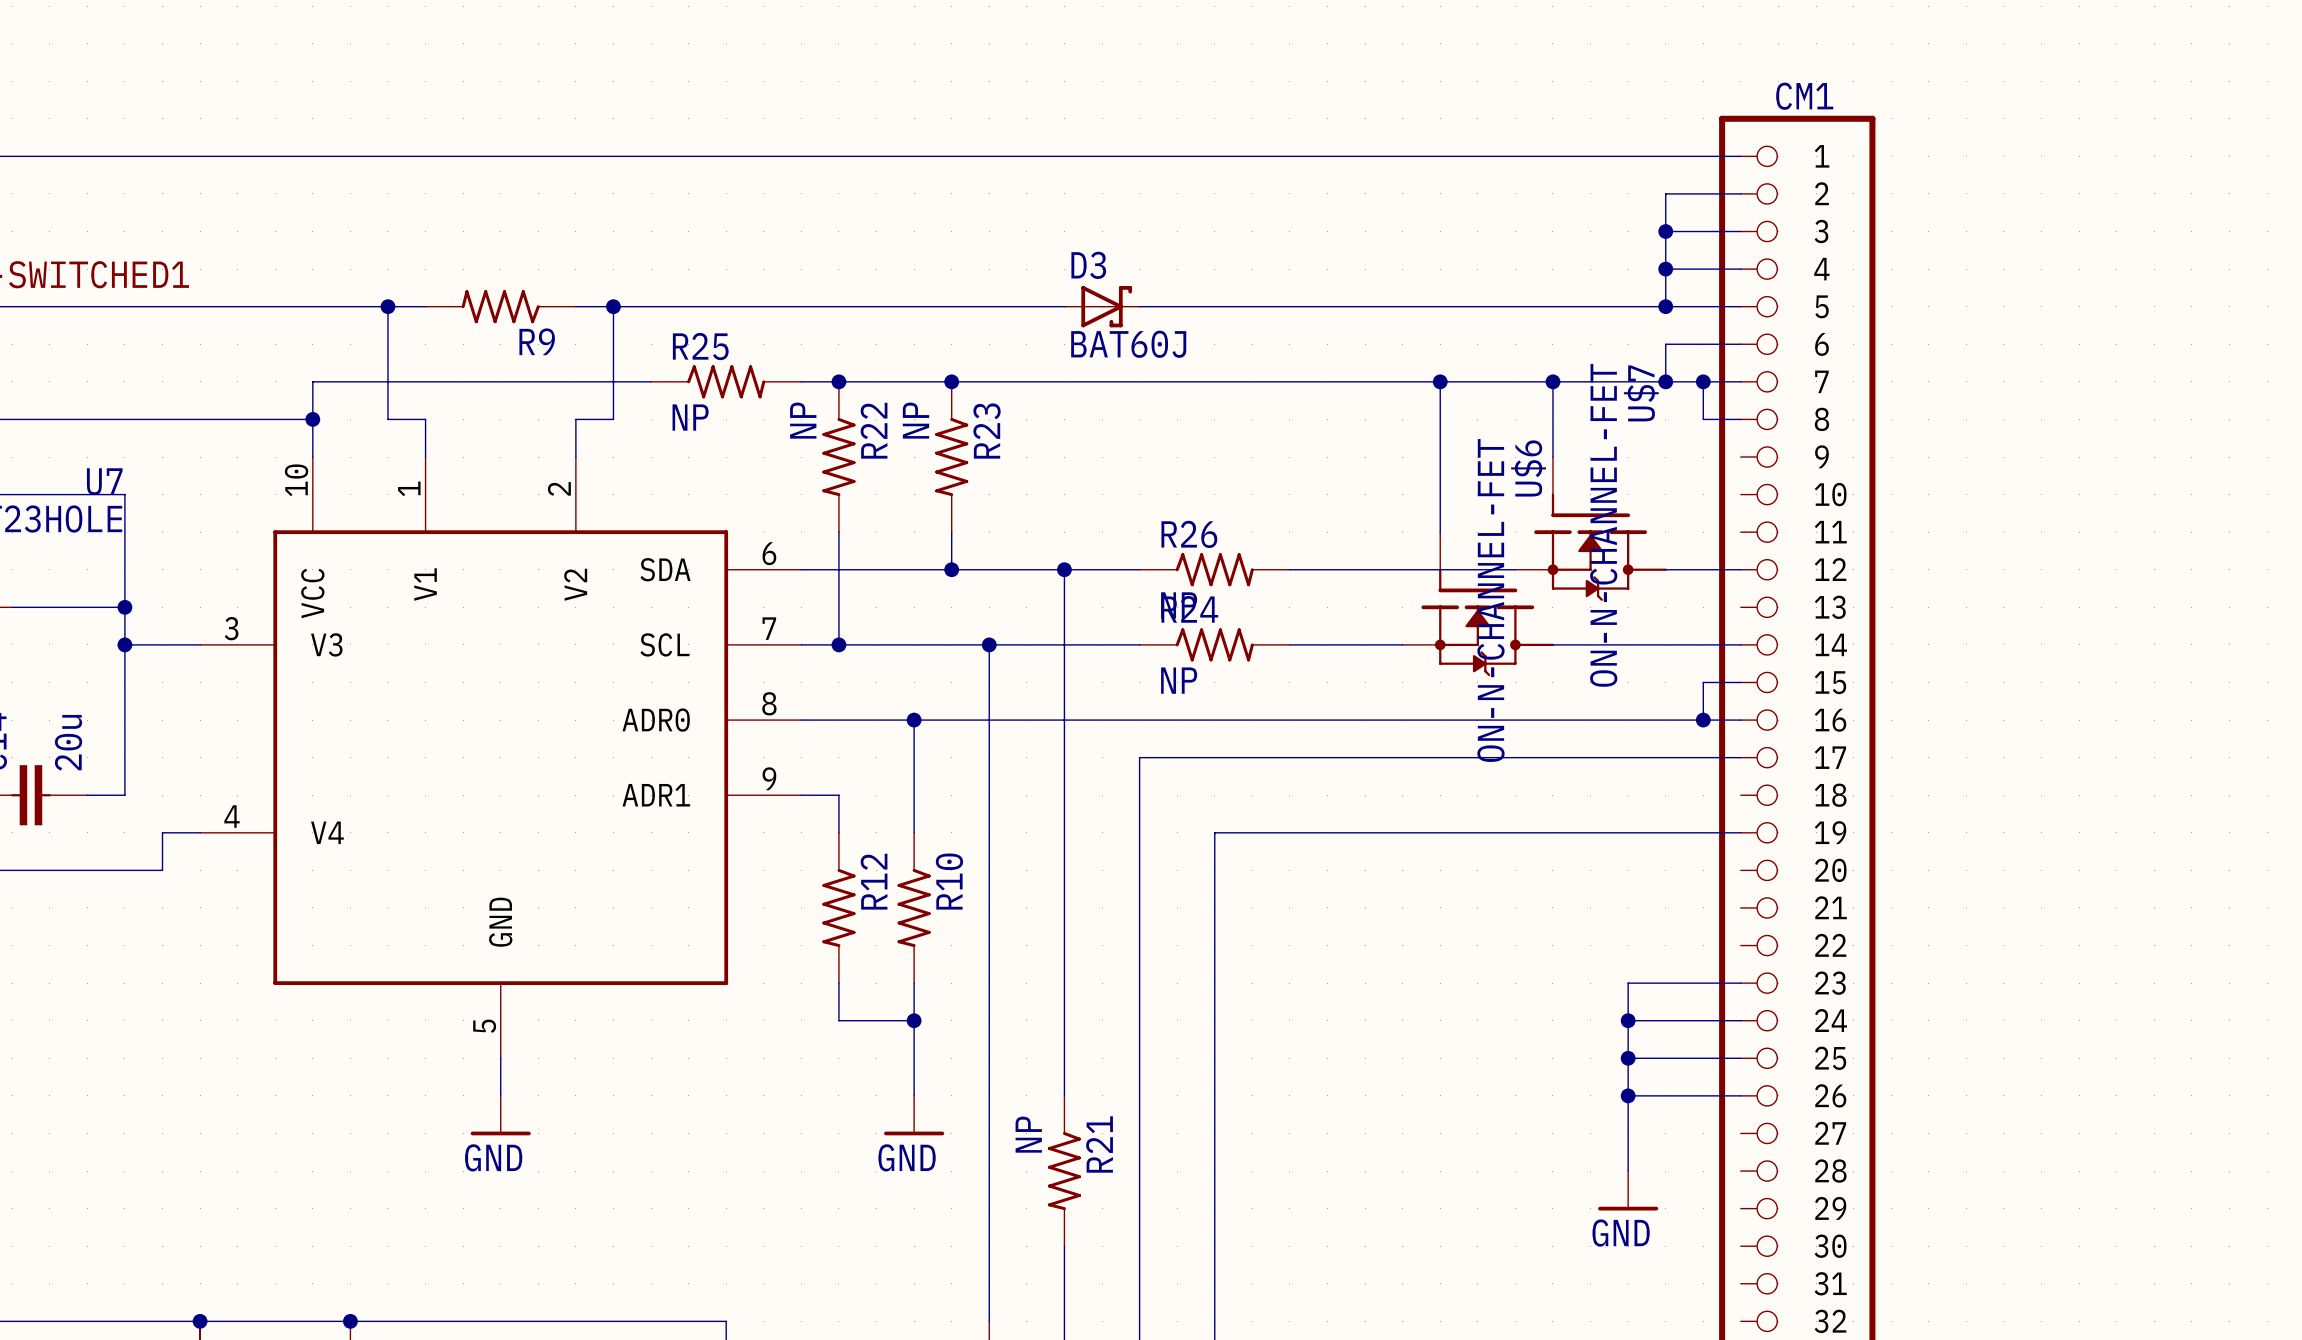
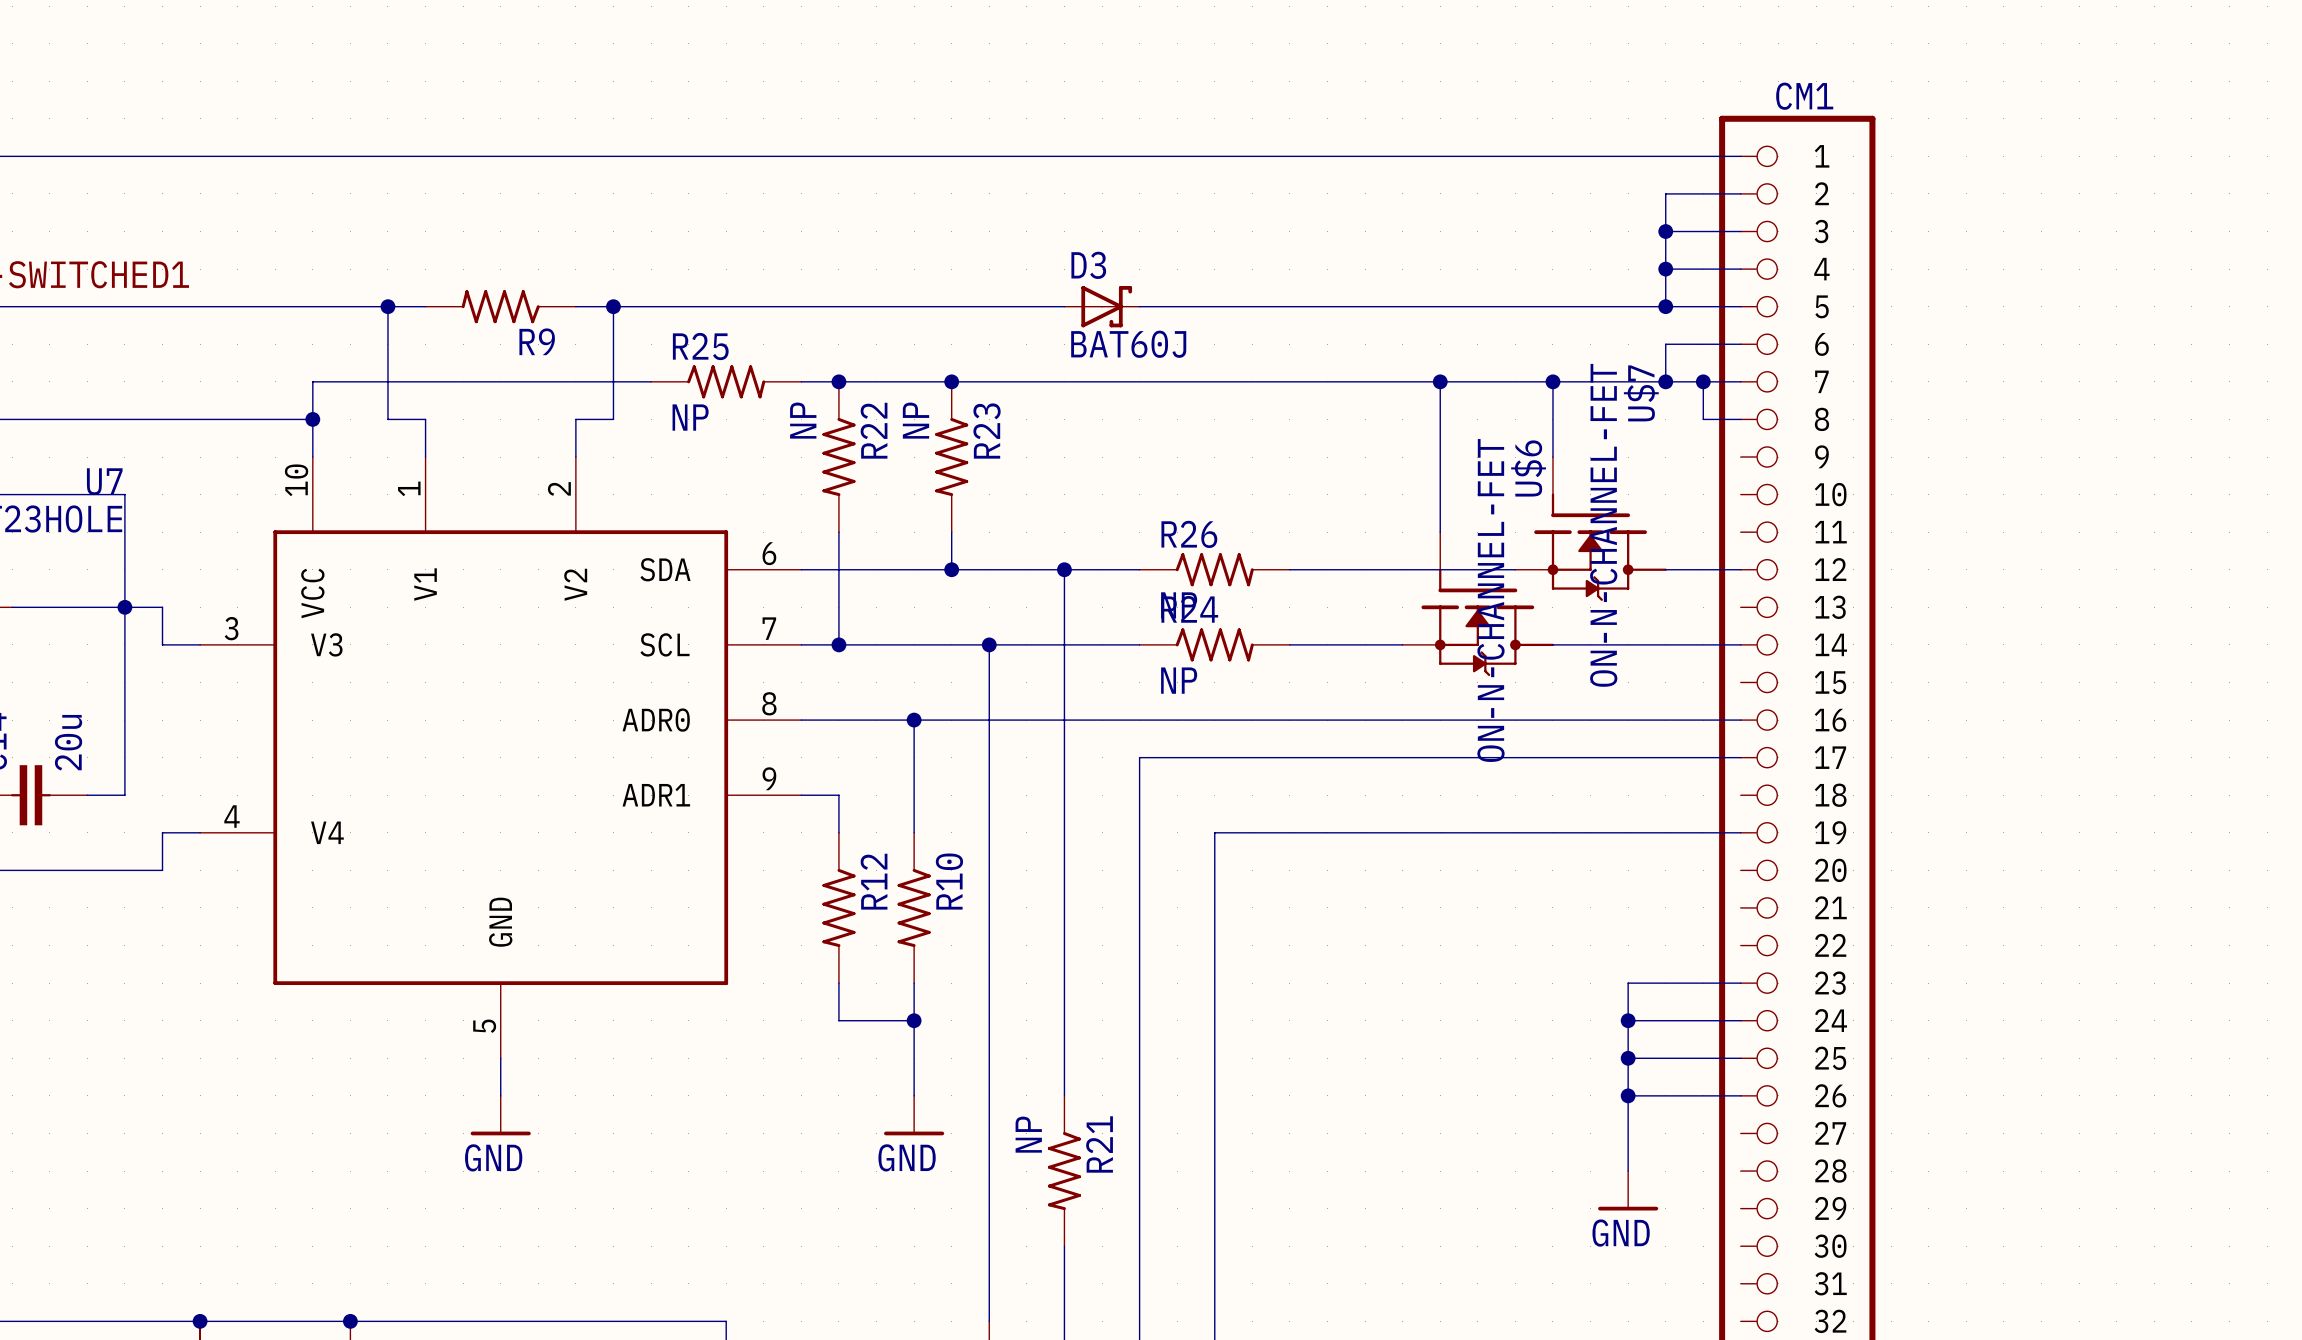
wire: (124, 644) (162, 644) -> (124, 607) (162, 607) (162, 644)
junction: (124, 644) -> none
wire: (1740, 682) (1703, 682) (1703, 720) -> none
junction: (1703, 720) -> none

